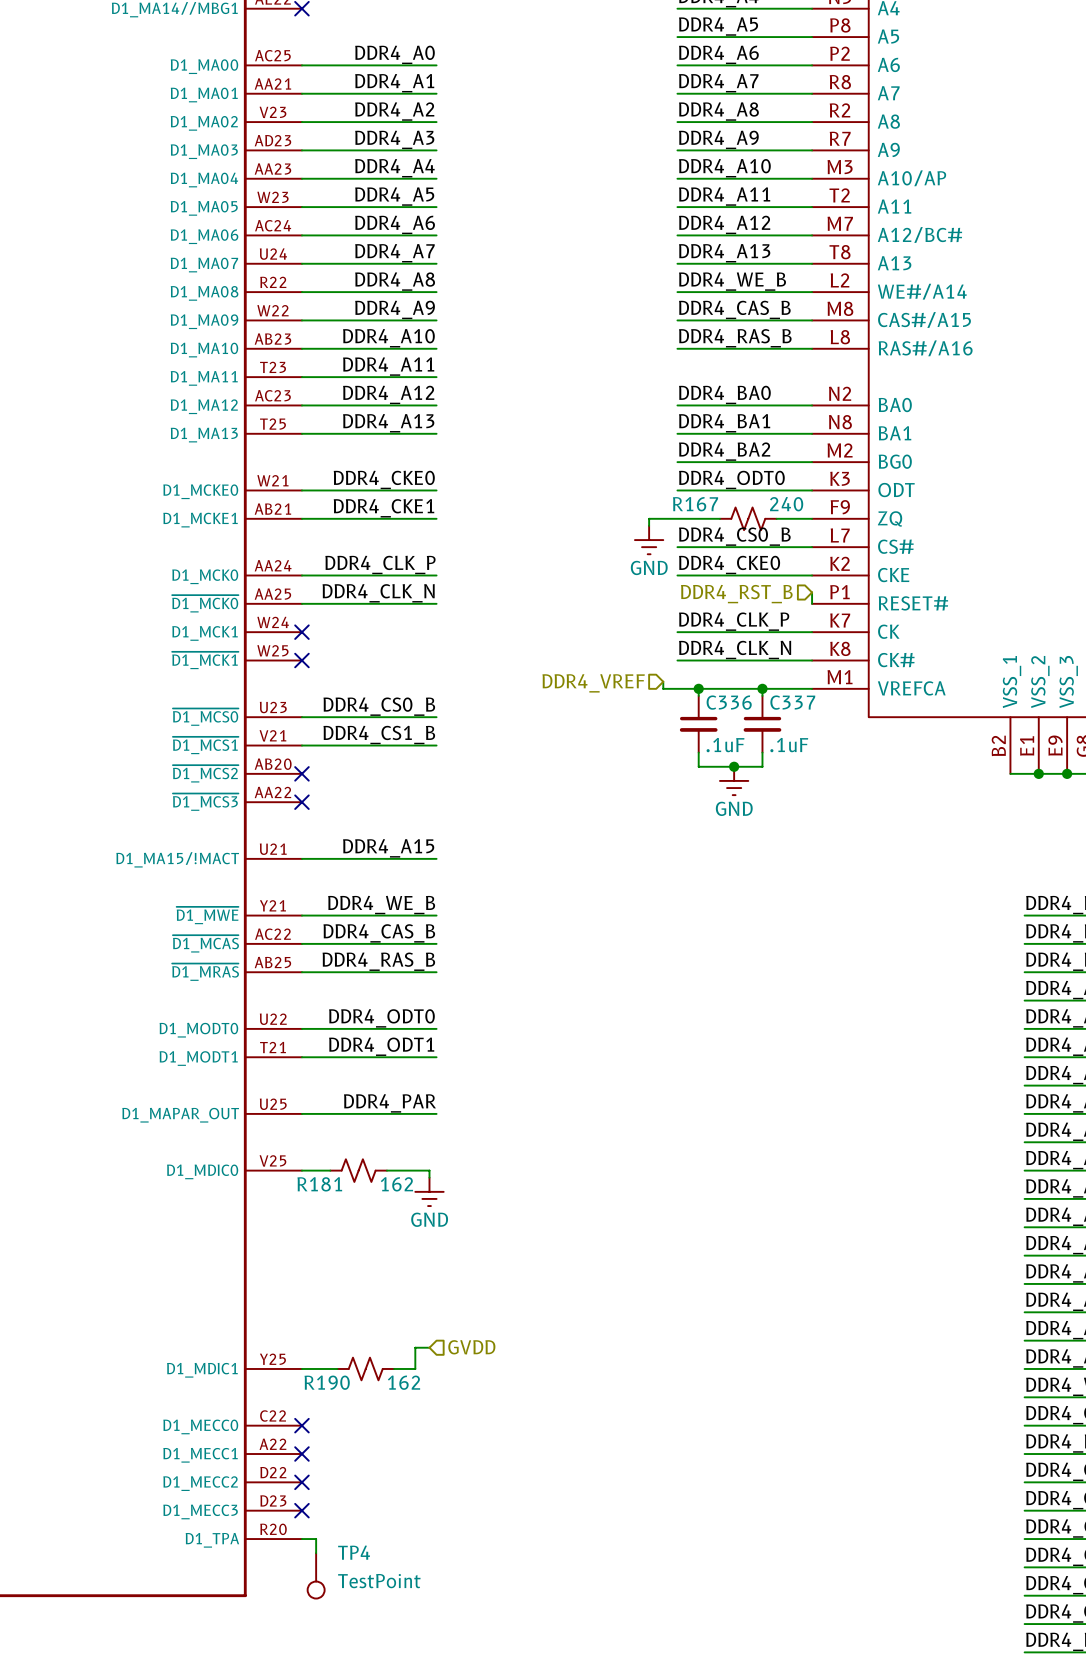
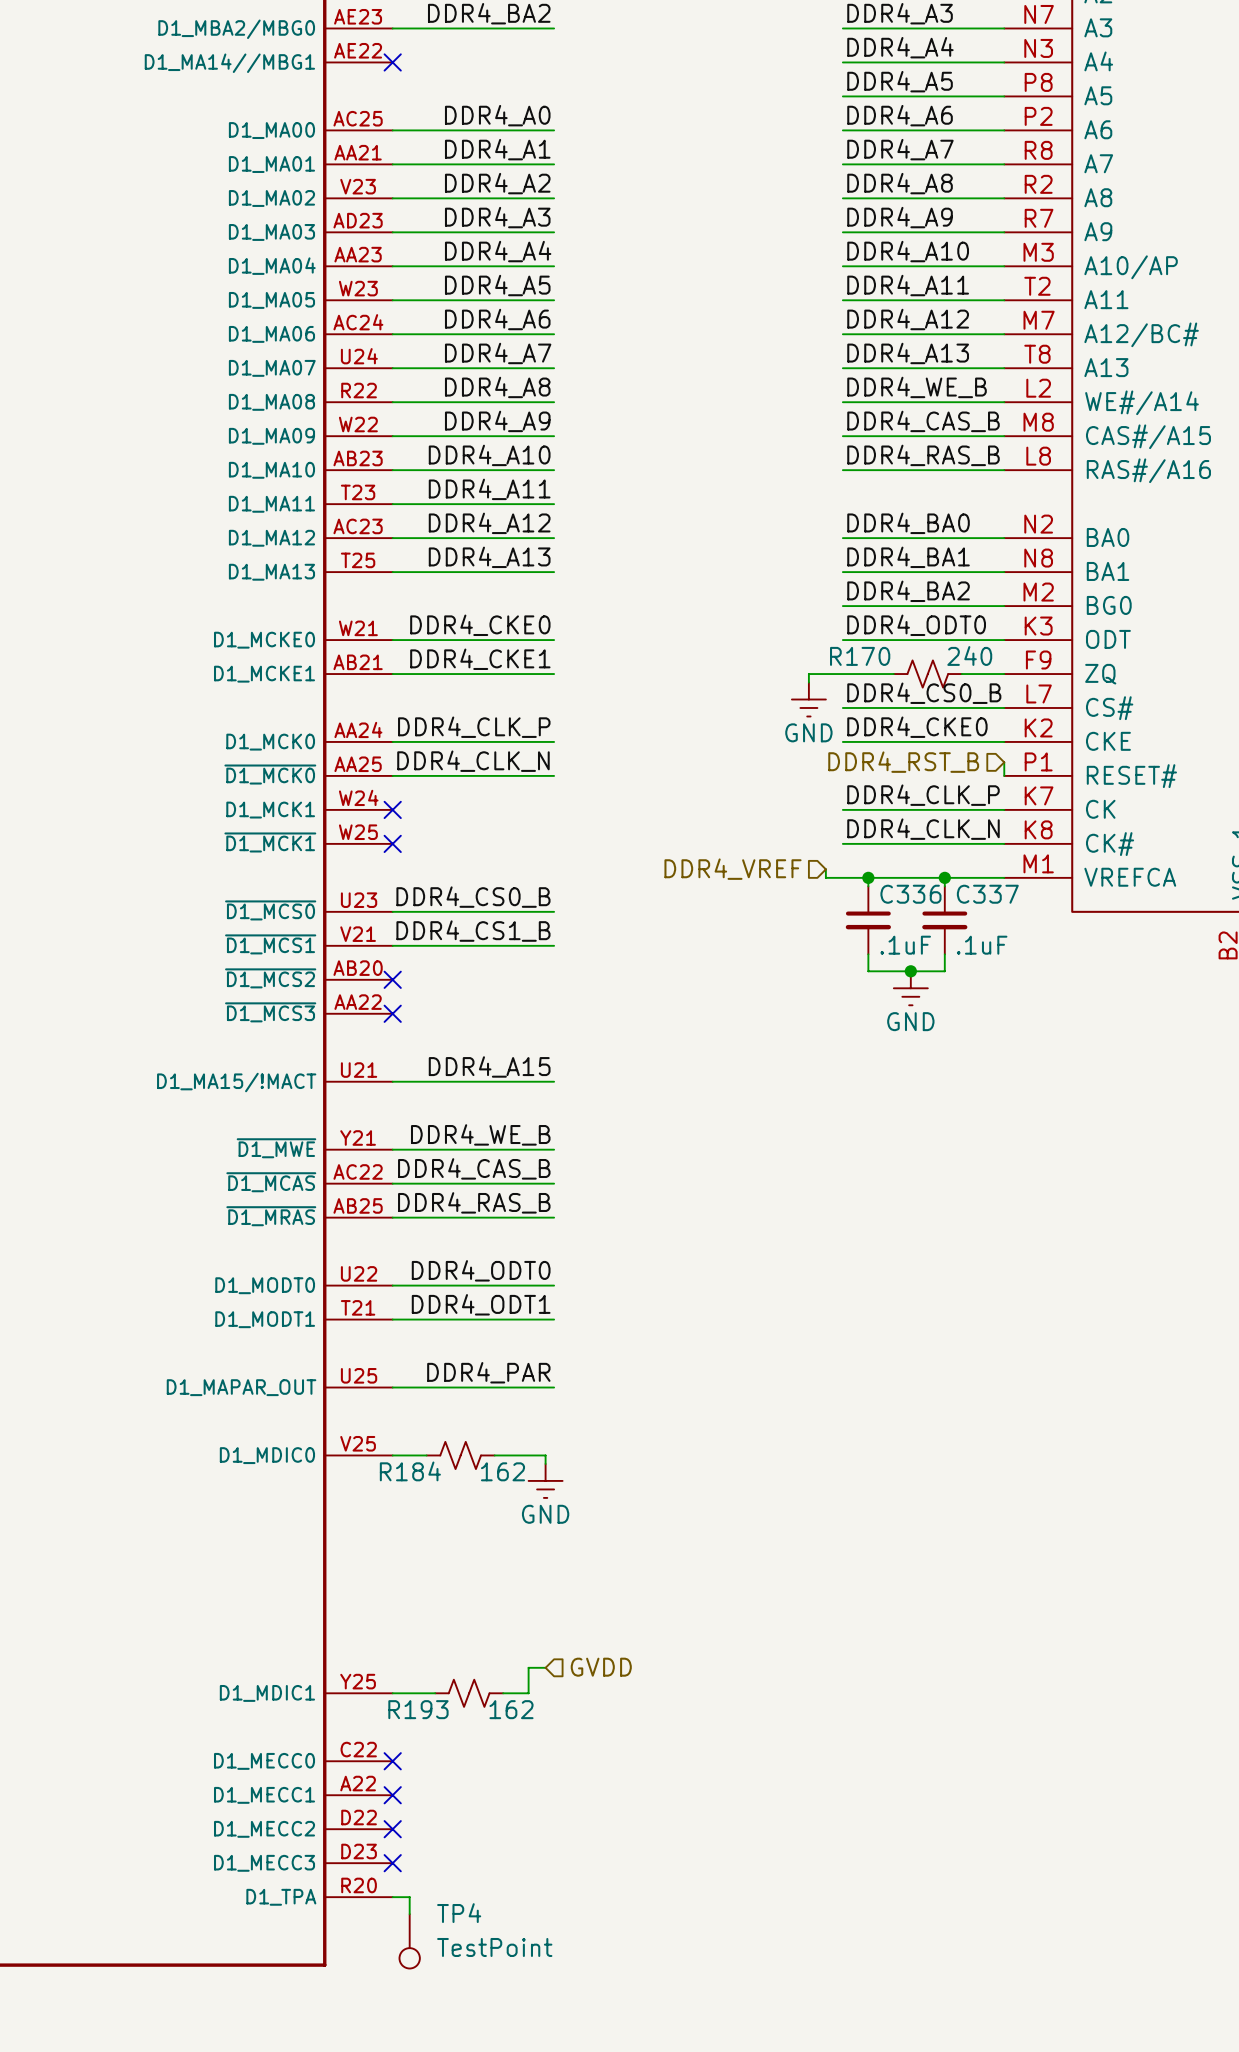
R167 name: R167 (695, 504) -> R170 (860, 656)
R181 name: R181 (319, 1184) -> R184 (410, 1471)
R190 name: R190 (327, 1382) -> R193 (418, 1709)

